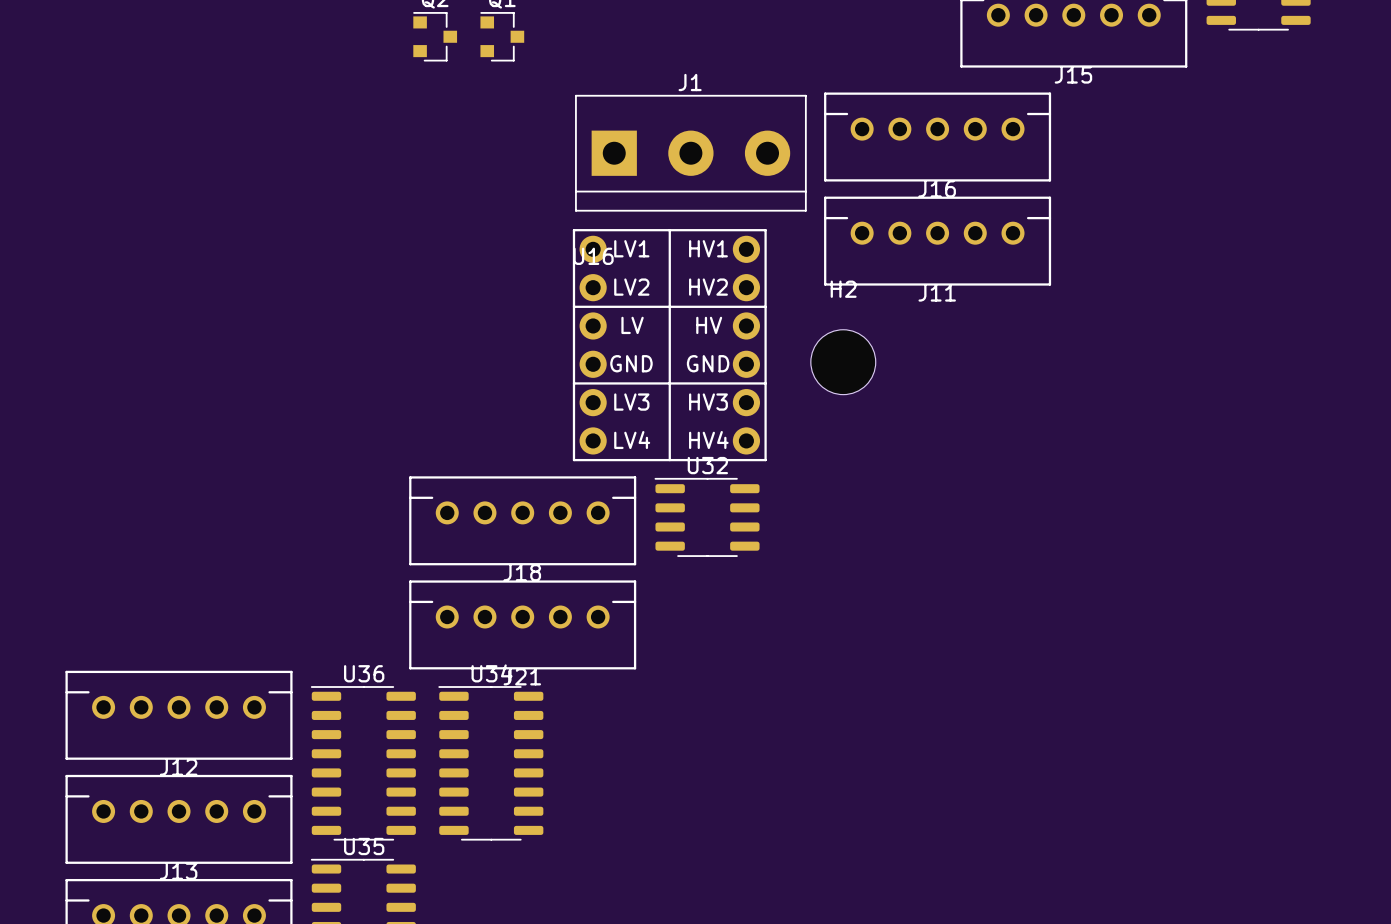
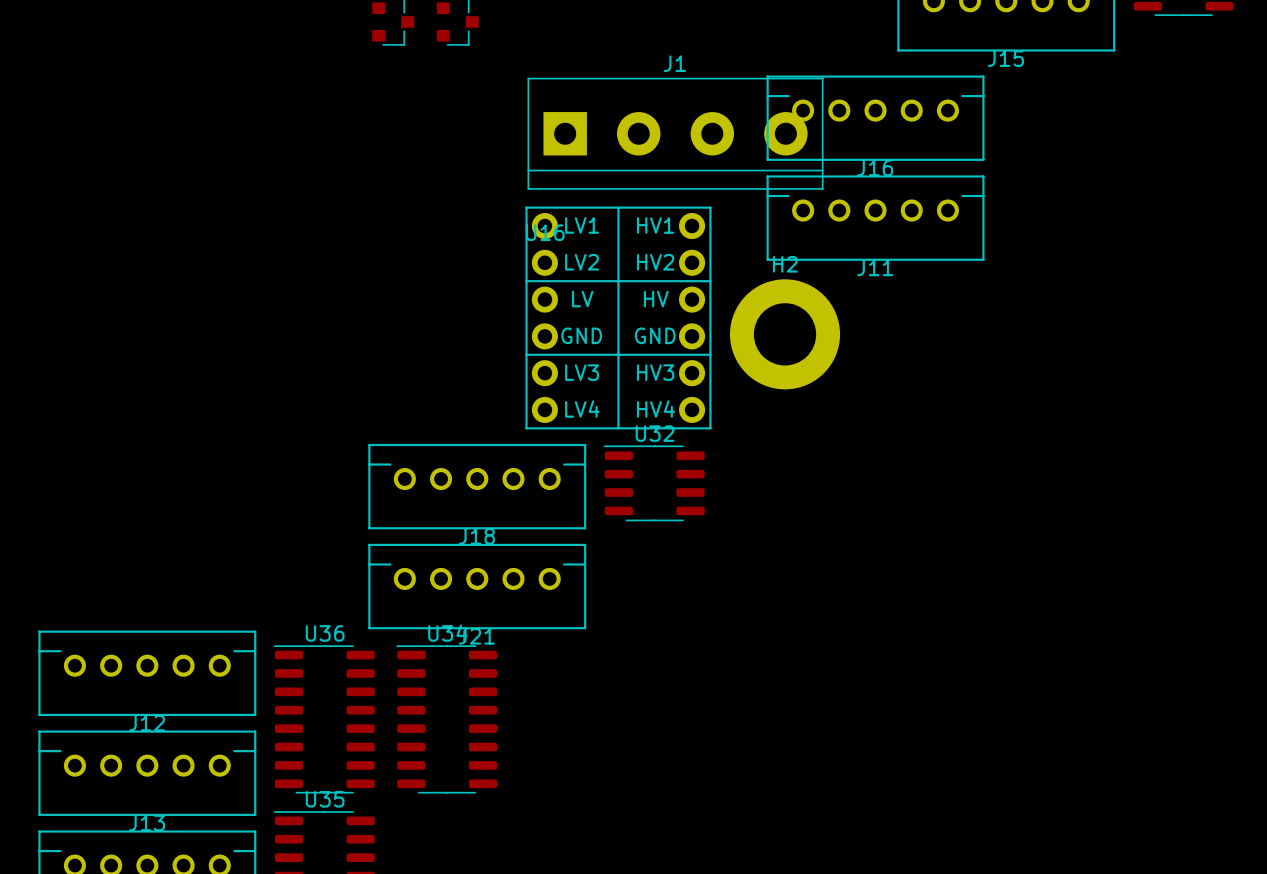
J1 footprint: [575, 94, 807, 212] -> [527, 77, 824, 190]
H2 footprint: [810, 329, 876, 395] -> [729, 279, 841, 390]

